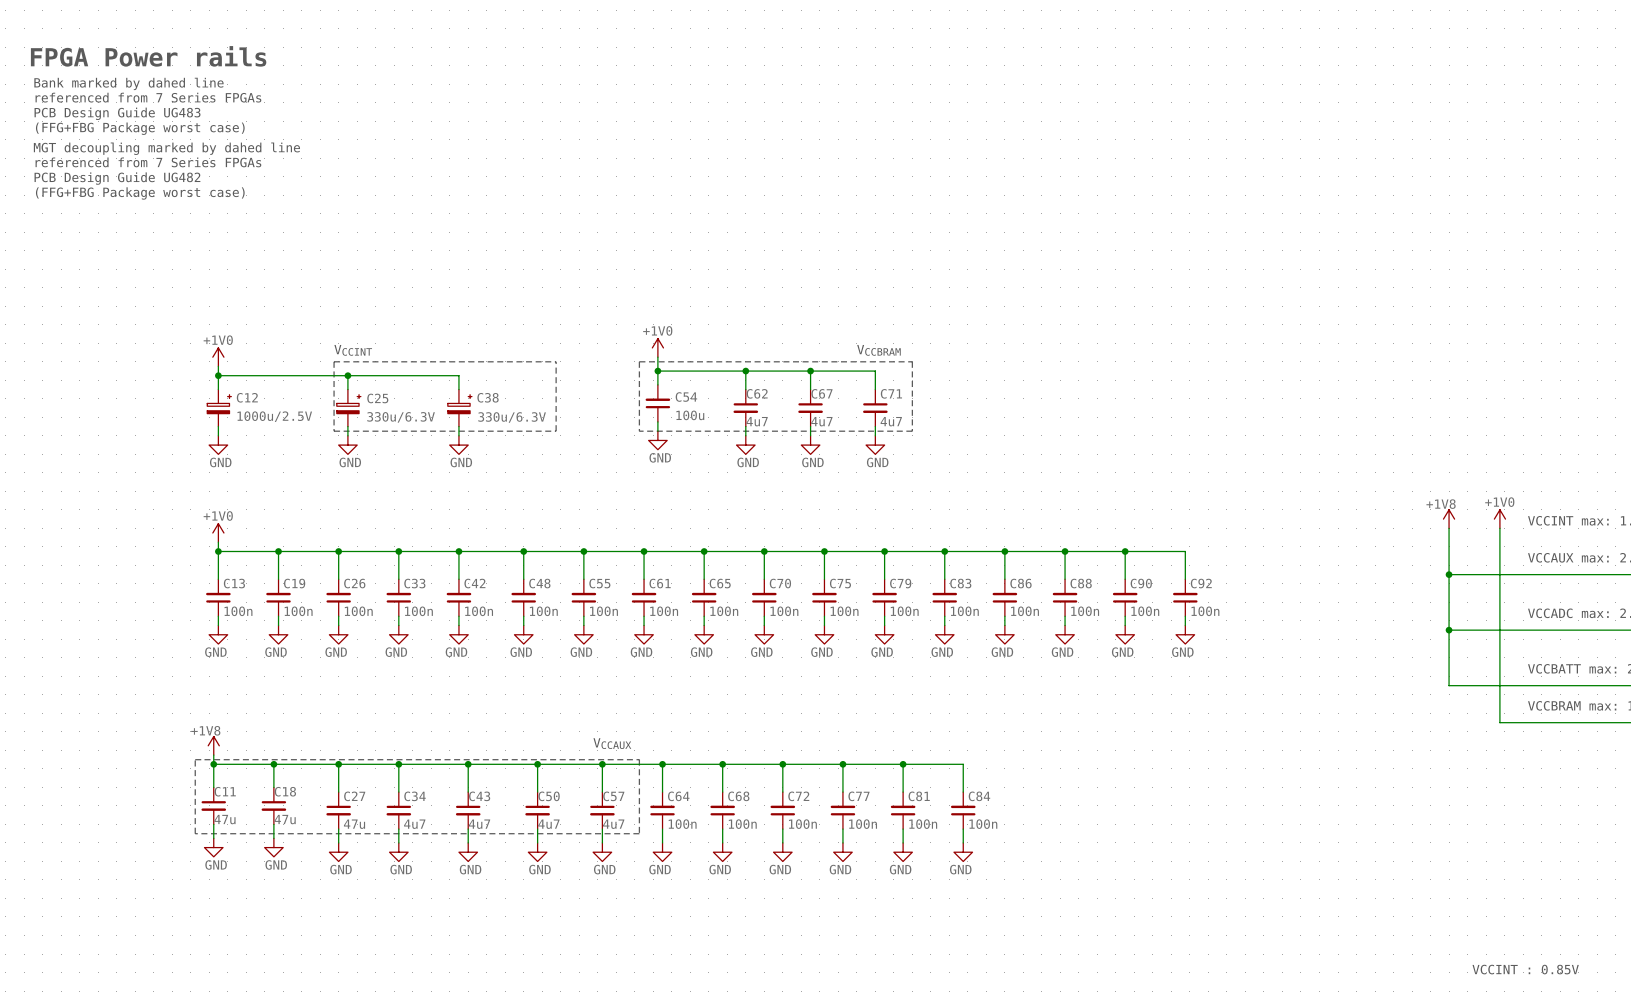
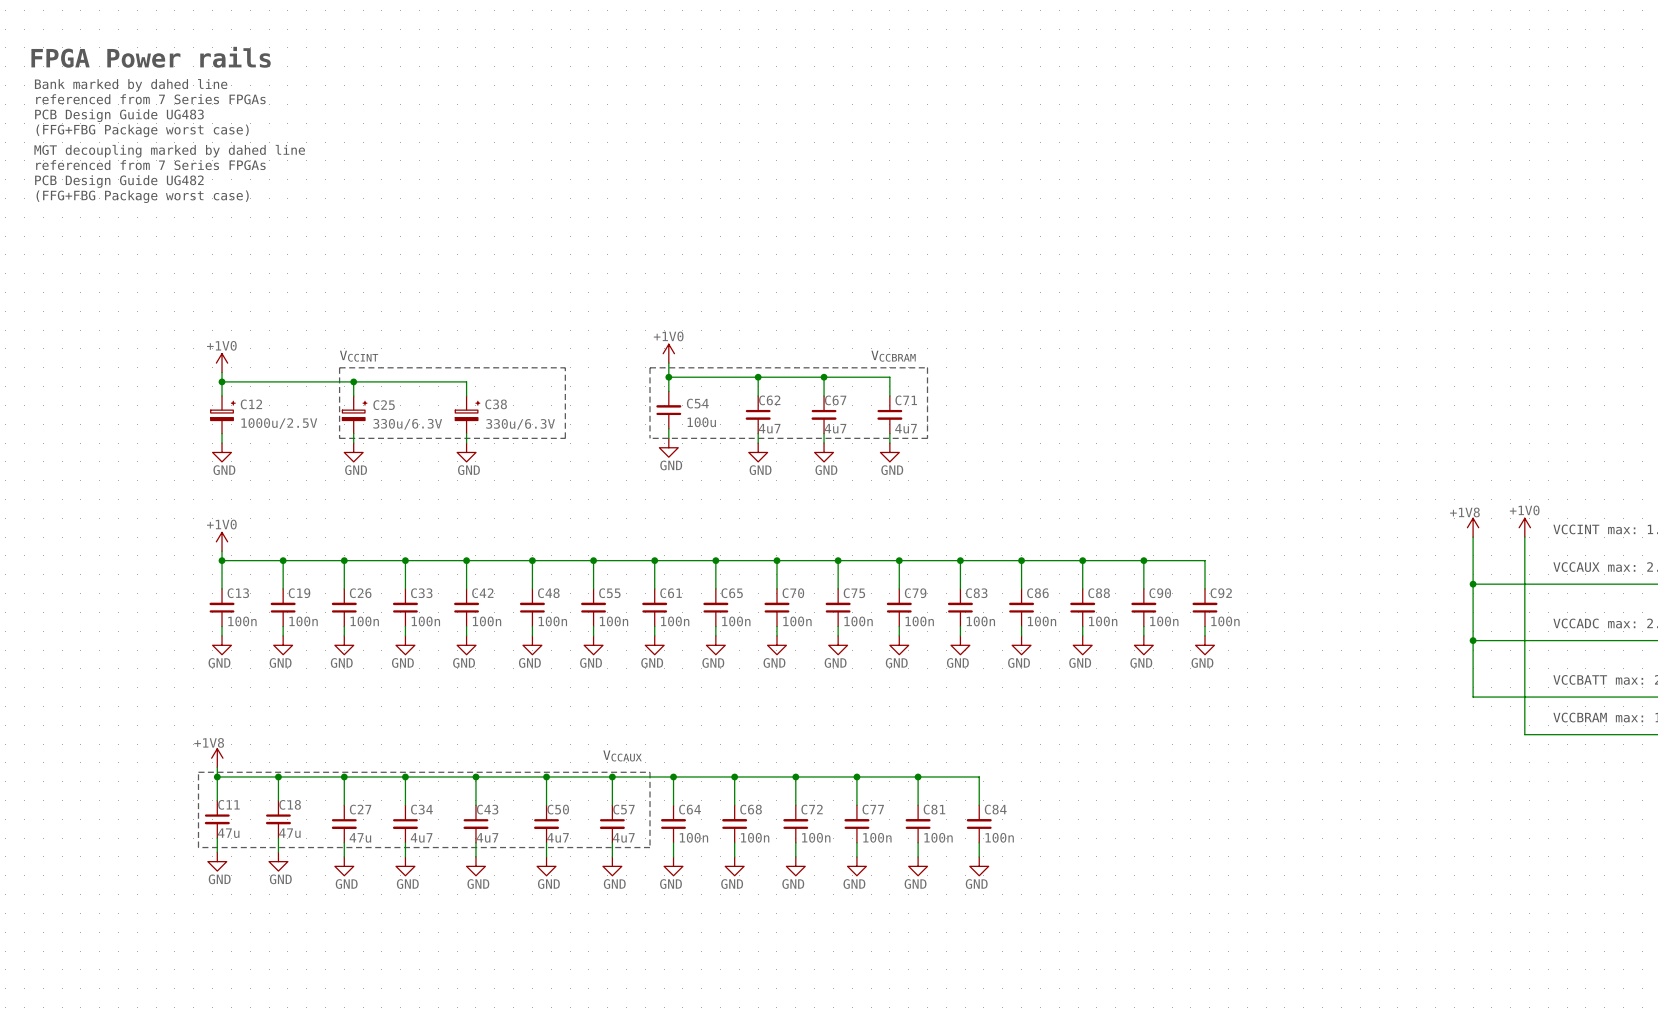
text: VCCINT : 0.85V (1525, 969) -> none

